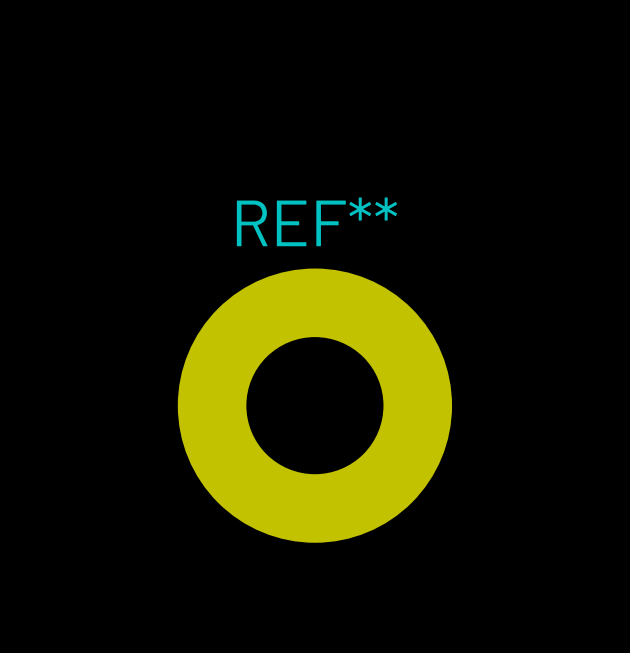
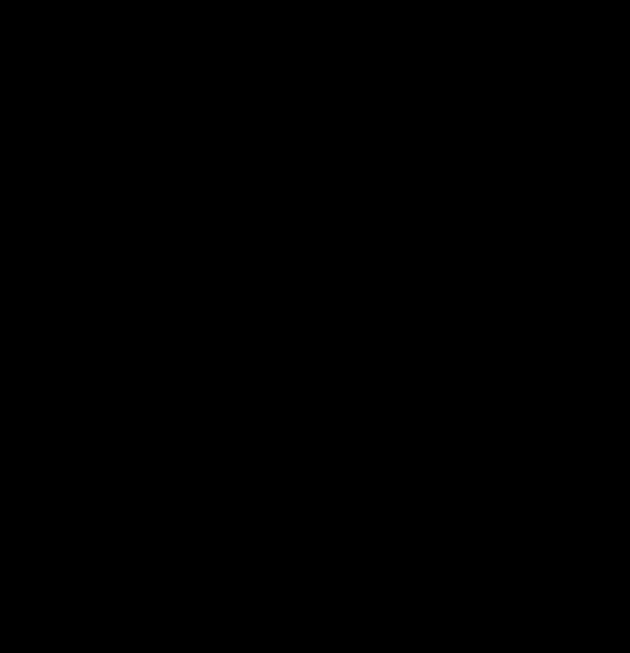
REF**: (314, 405) -> none

